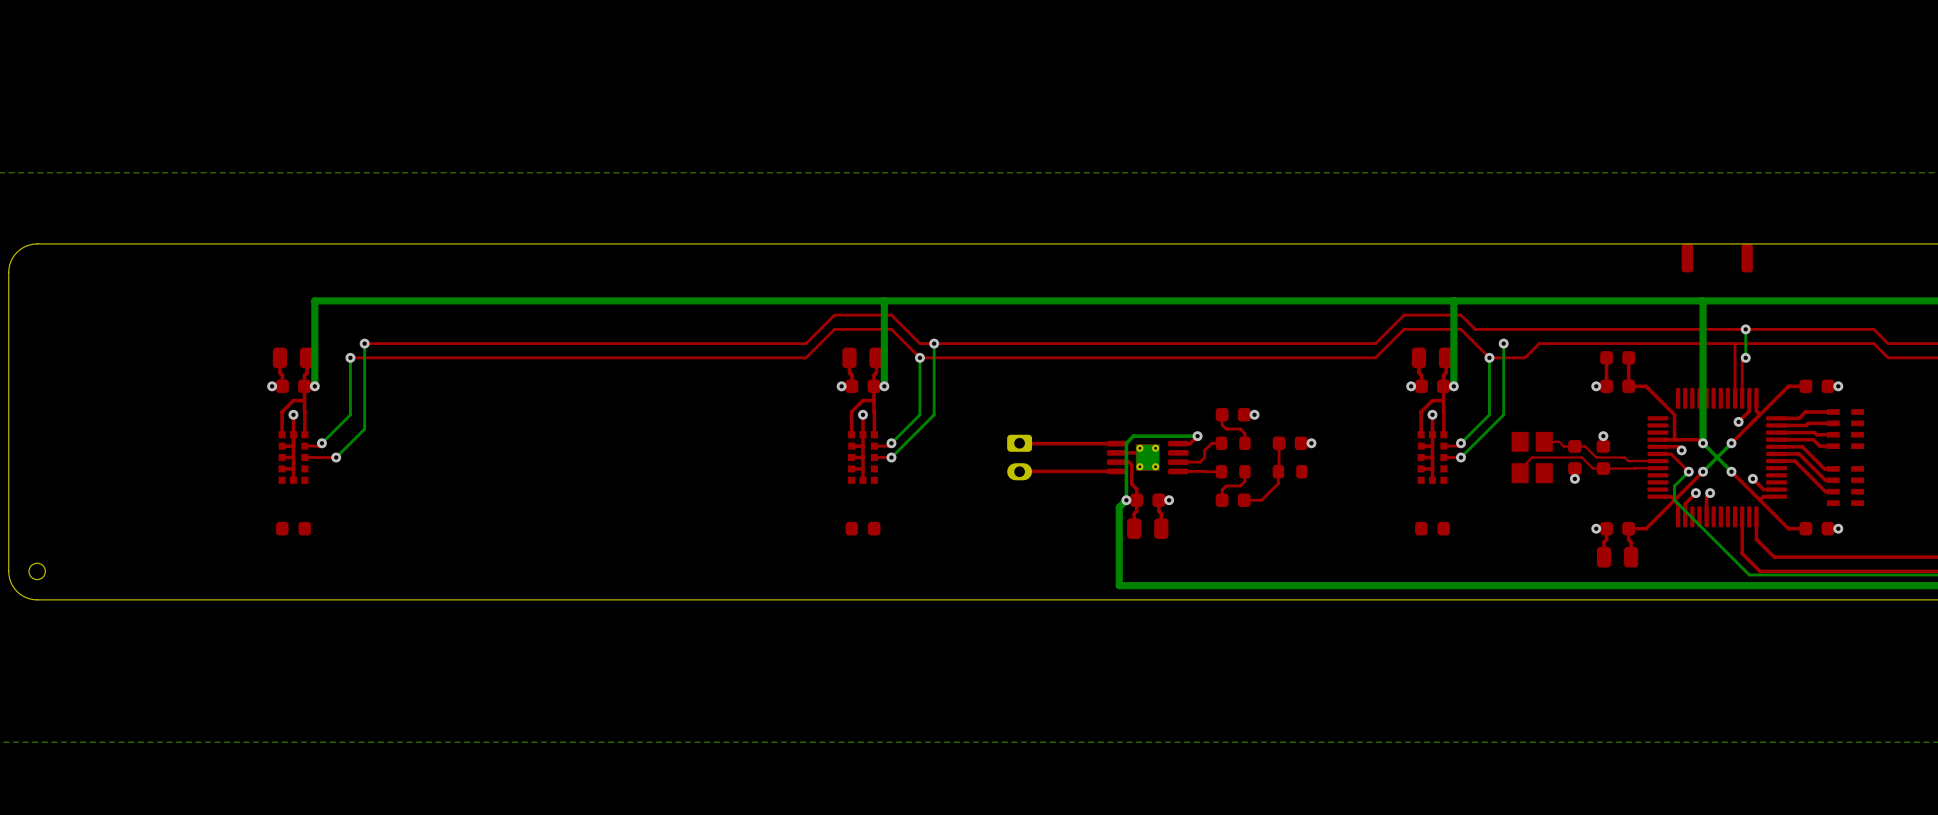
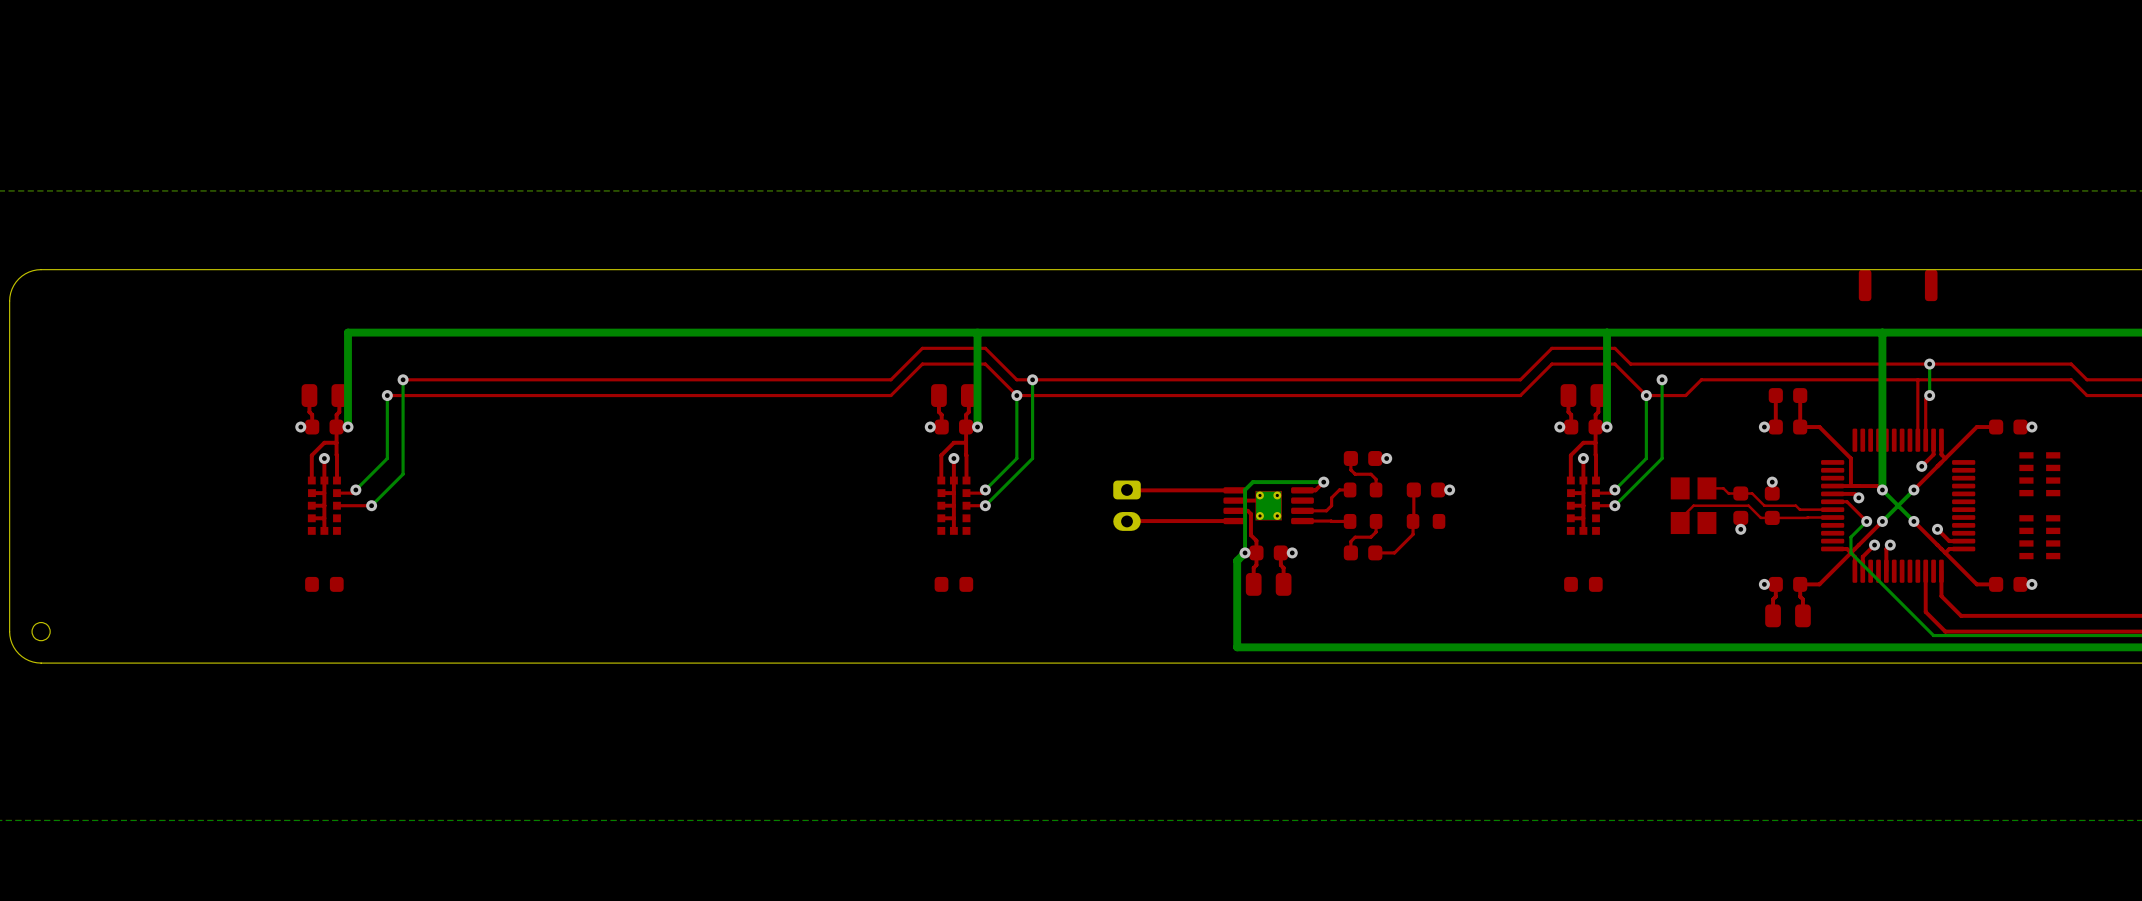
top track: (1833, 411) (1805, 411) (1799, 418) (1776, 418) -> none
top track: (1833, 423) (1776, 425) -> none
top track: (1776, 432) (1833, 434) -> none
top track: (1776, 439) (1813, 439) (1819, 446) (1833, 446) -> none
top track: (1776, 446) (1802, 446) (1824, 468) (1833, 468) -> none
top track: (1776, 453) (1799, 453) (1825, 480) (1833, 480) -> none
top track: (1776, 461) (1794, 461) (1825, 491) (1833, 491) -> none

